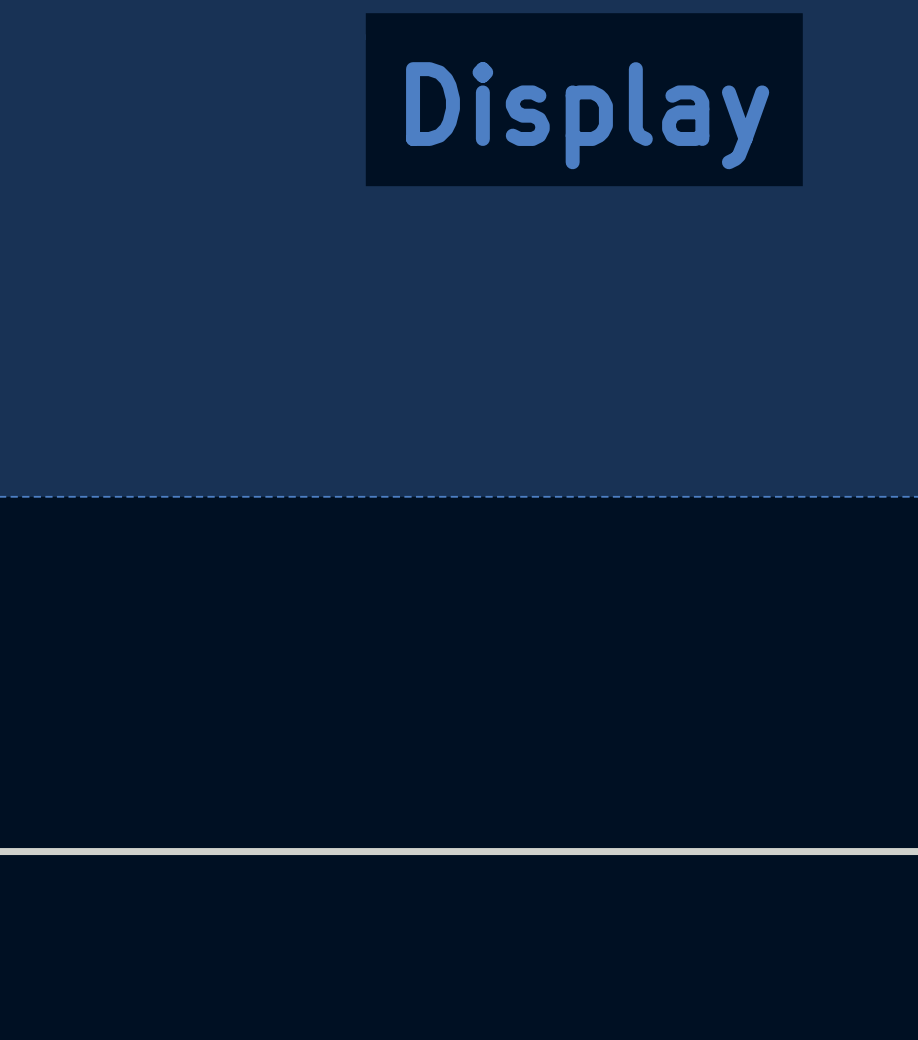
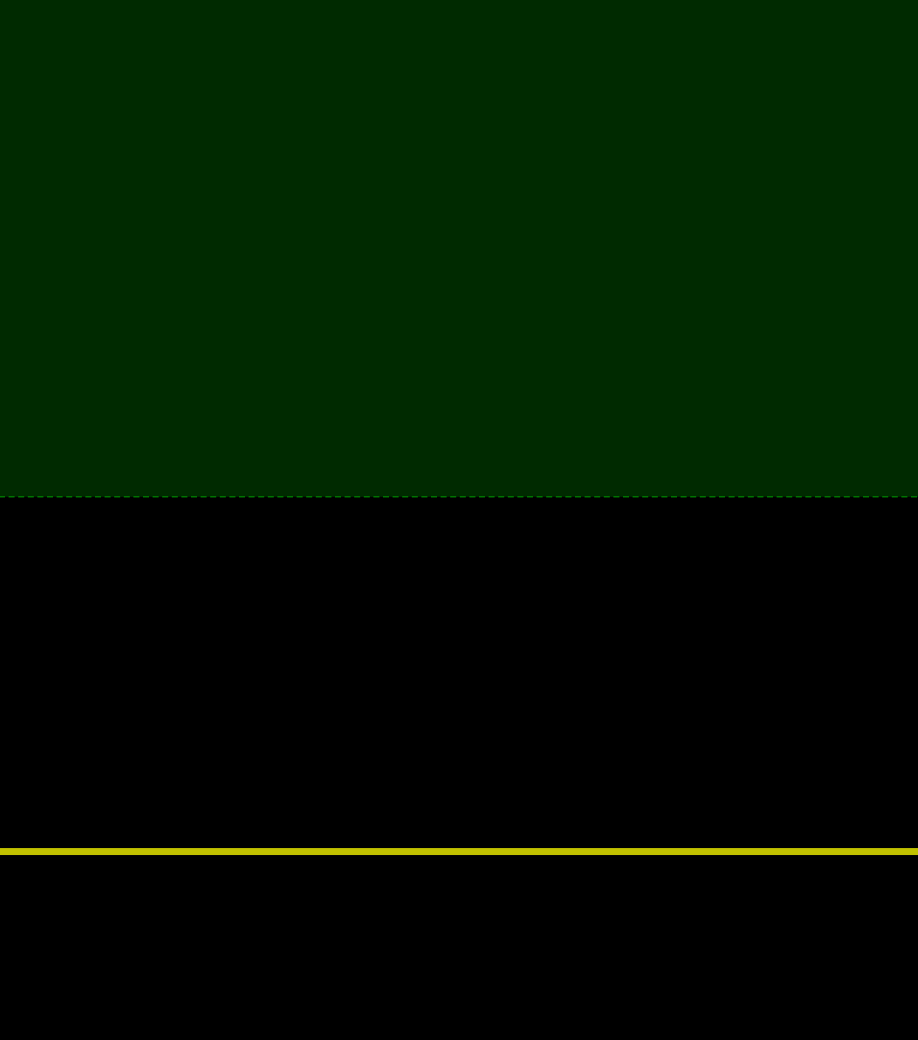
text: Display (587, 115) -> none

